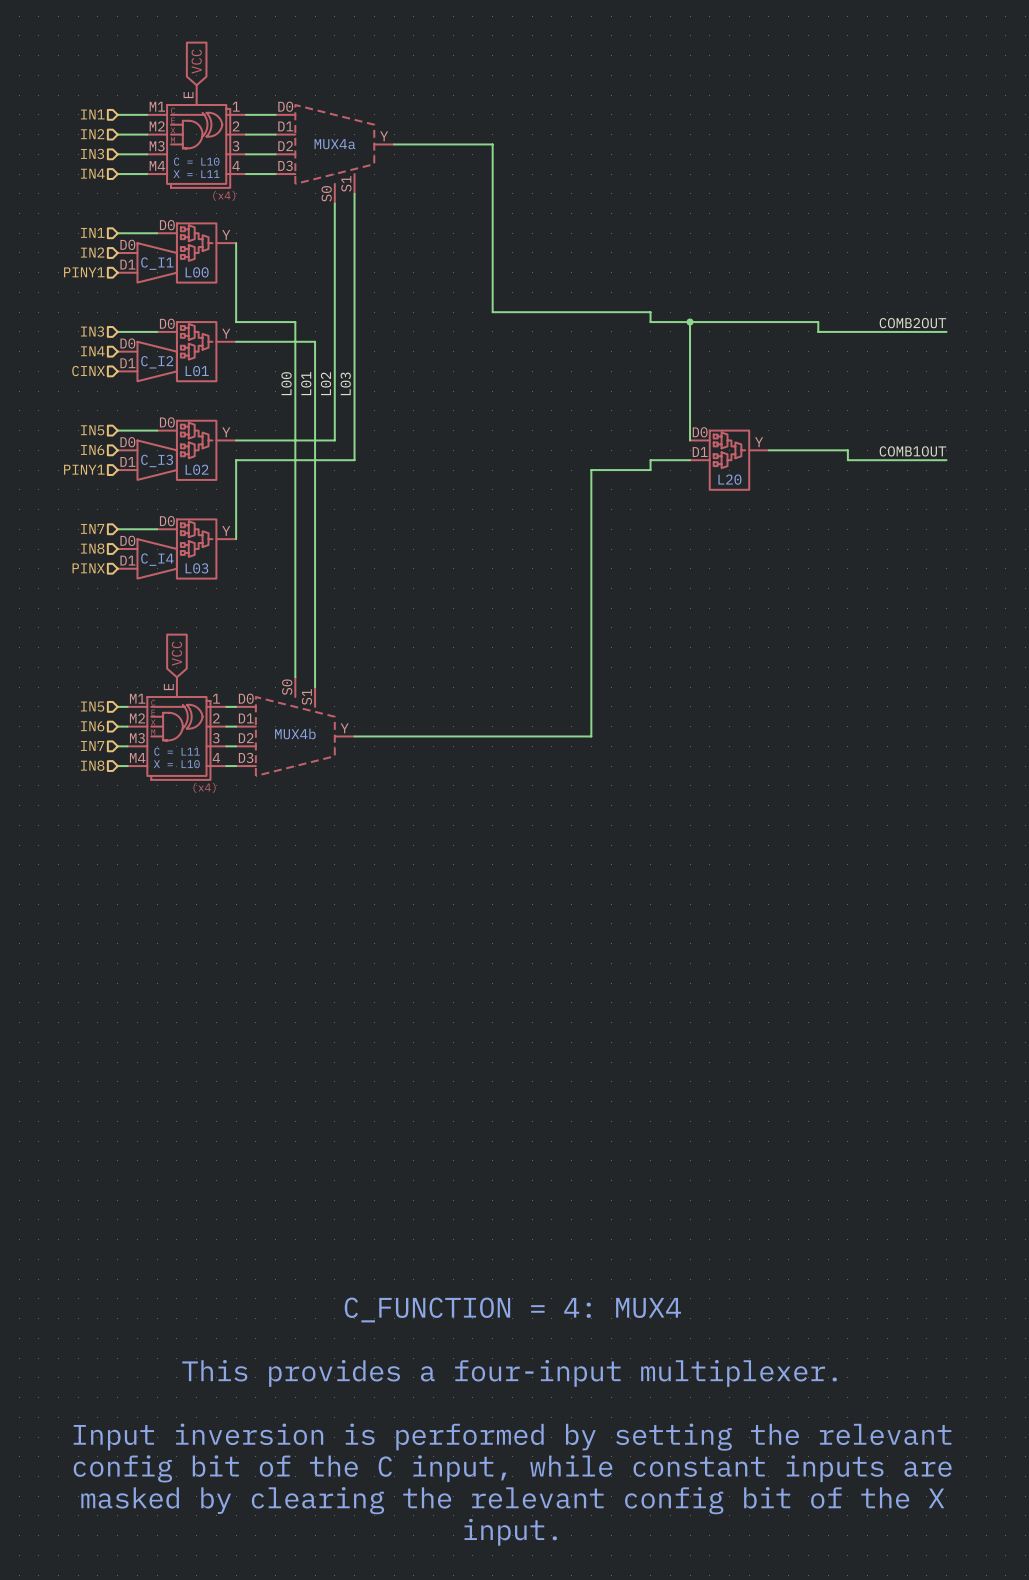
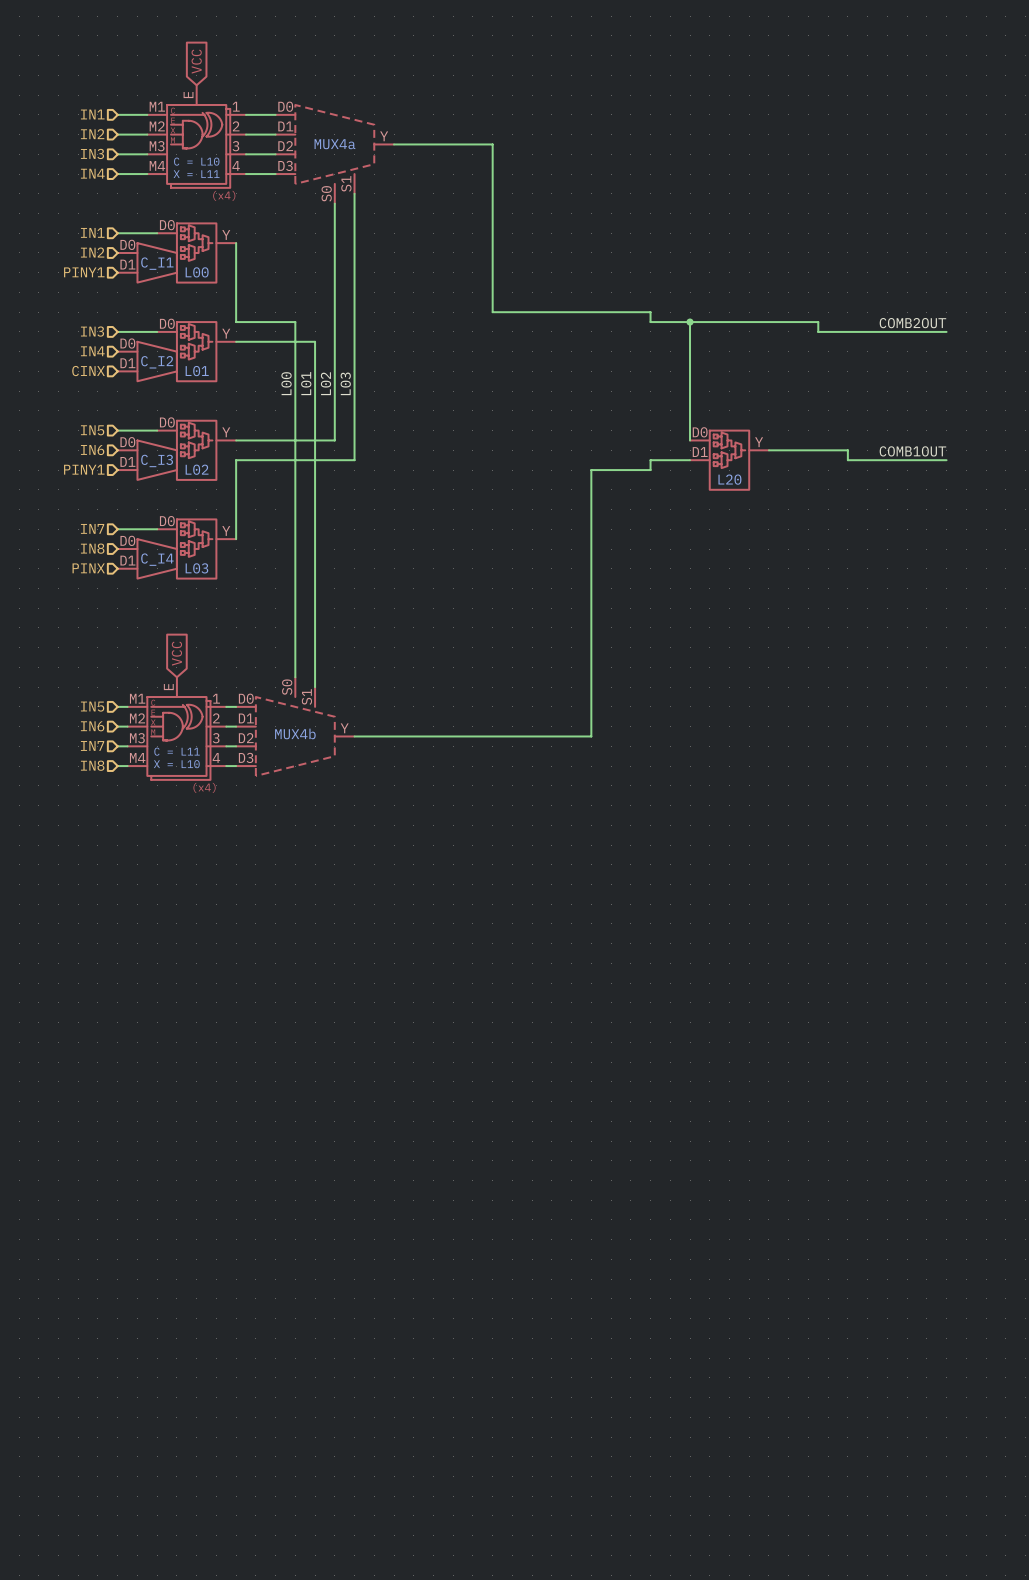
text: C_FUNCTION = 4: MUX4 (512, 1309) -> none
text: This provides a four-input multiplexer. (509, 1373) -> none
text: Input inversion is performed by setting the relevant (512, 1437) -> none
text: config bit of the C input, while constant inputs are (512, 1468) -> none
text: masked by clearing the relevant config bit of the X (512, 1500) -> none
text: input. (510, 1532) -> none

